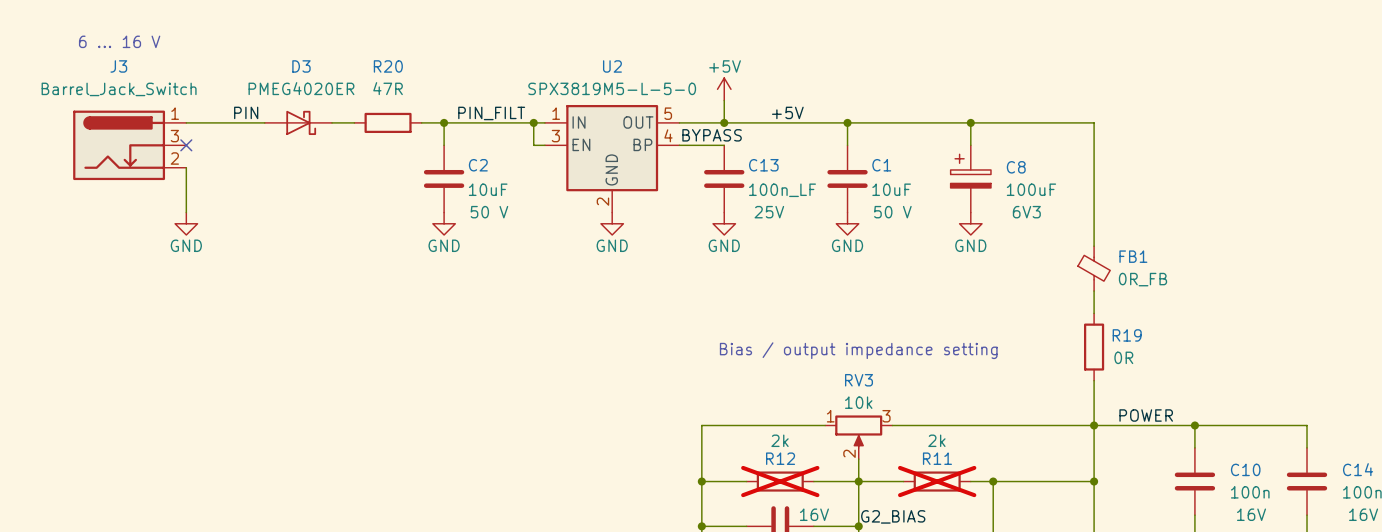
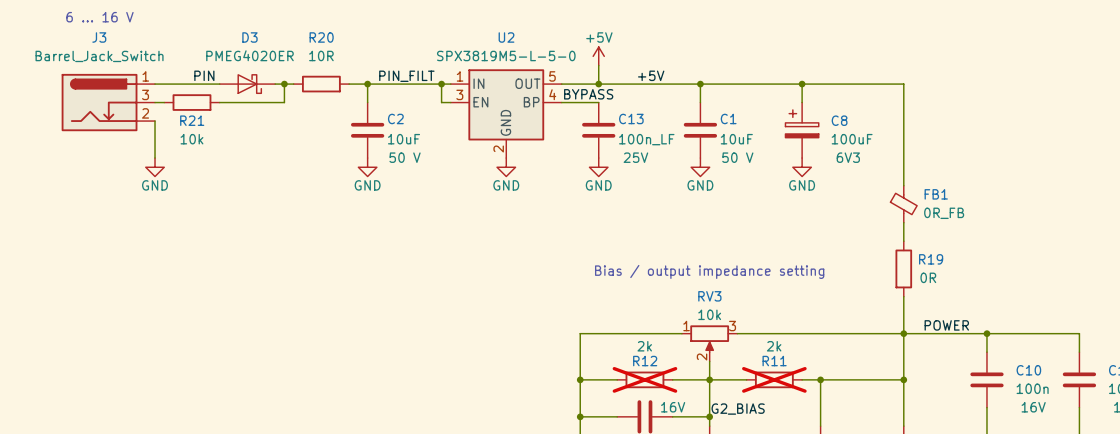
R20 value: 47R (388, 88) -> 10R (321, 55)
wire: none -> (284, 84) (284, 102) (219, 102)
junction: none -> (284, 84)
wire: none -> (155, 102) (164, 102)
no-connect mark: (186, 145) -> none
R21: none -> 10k (191, 102)

